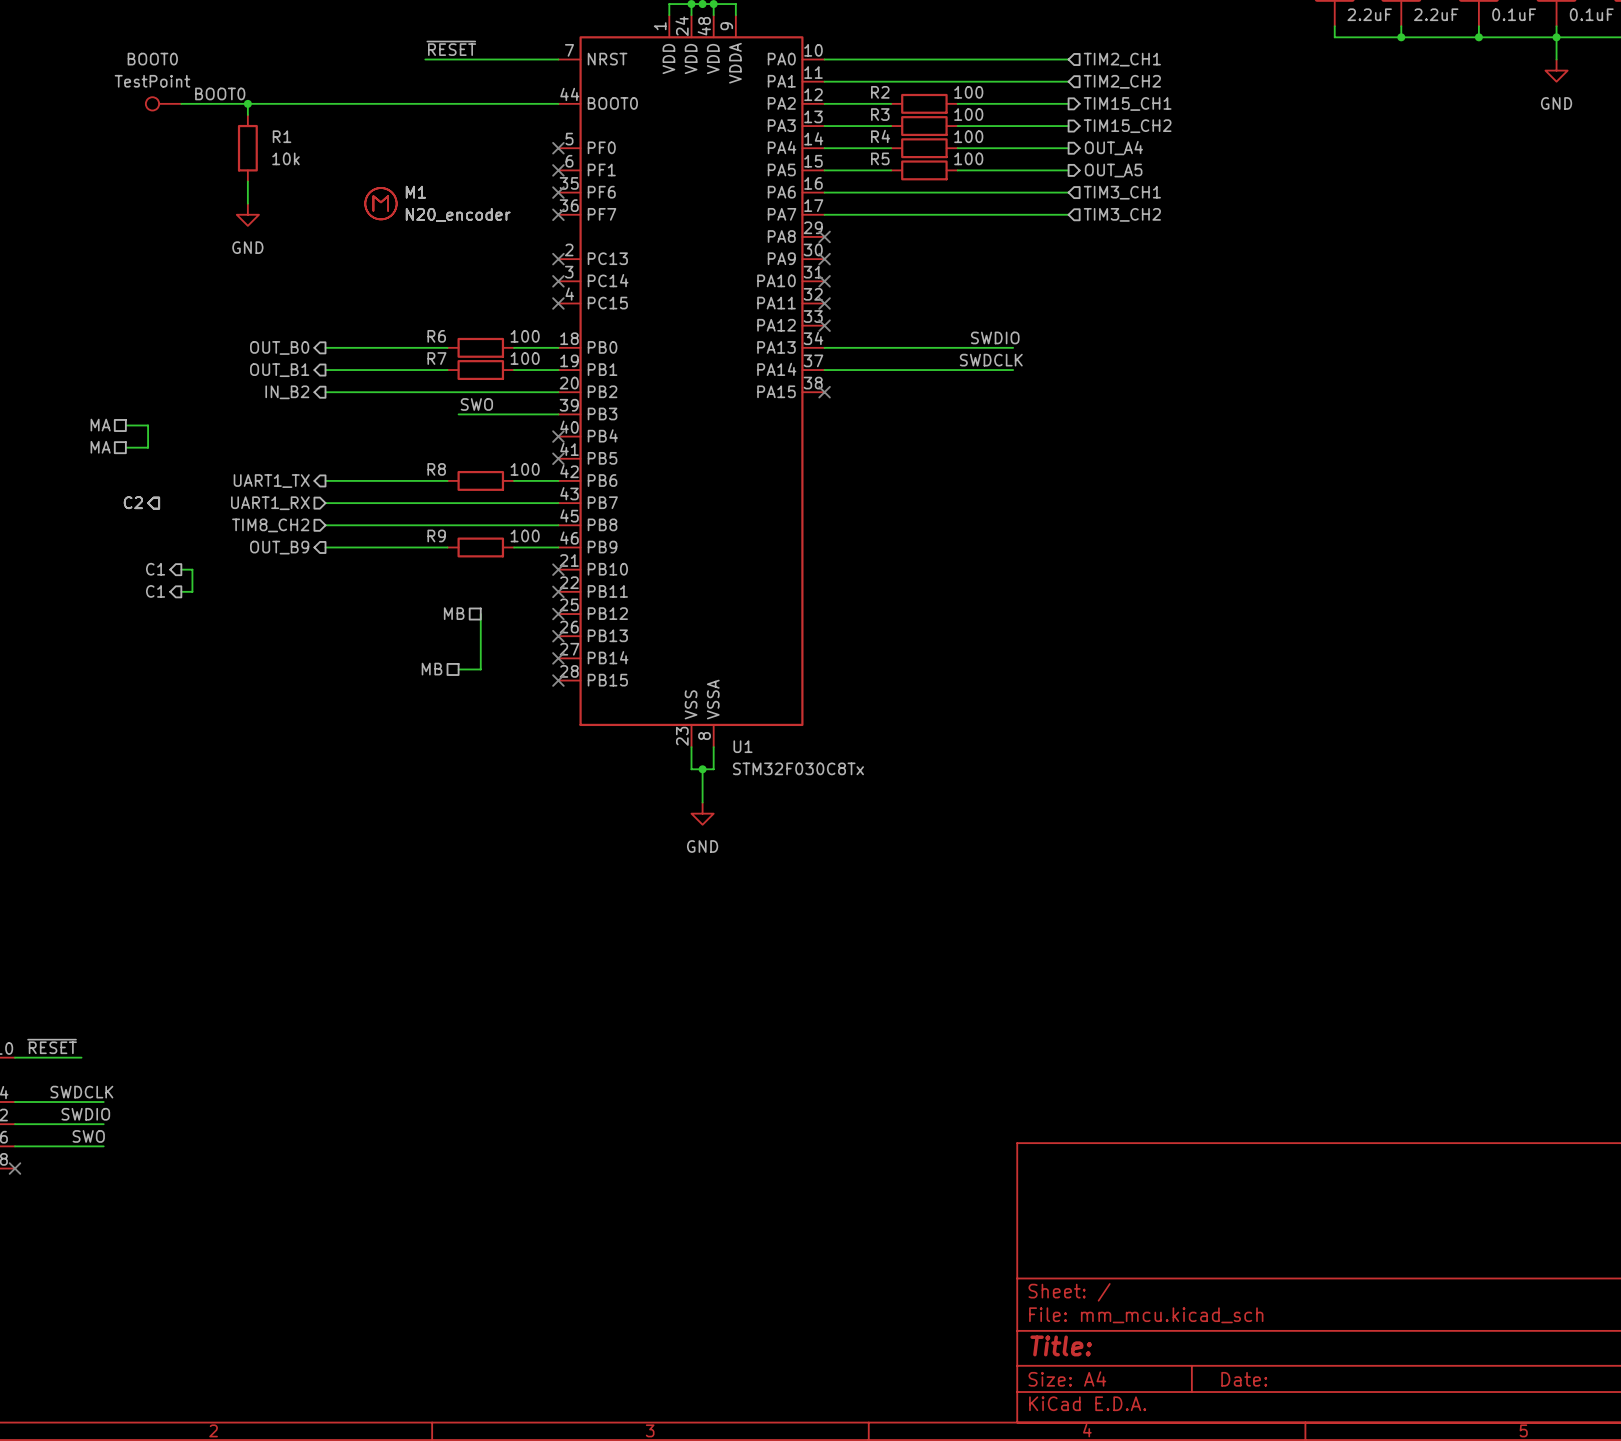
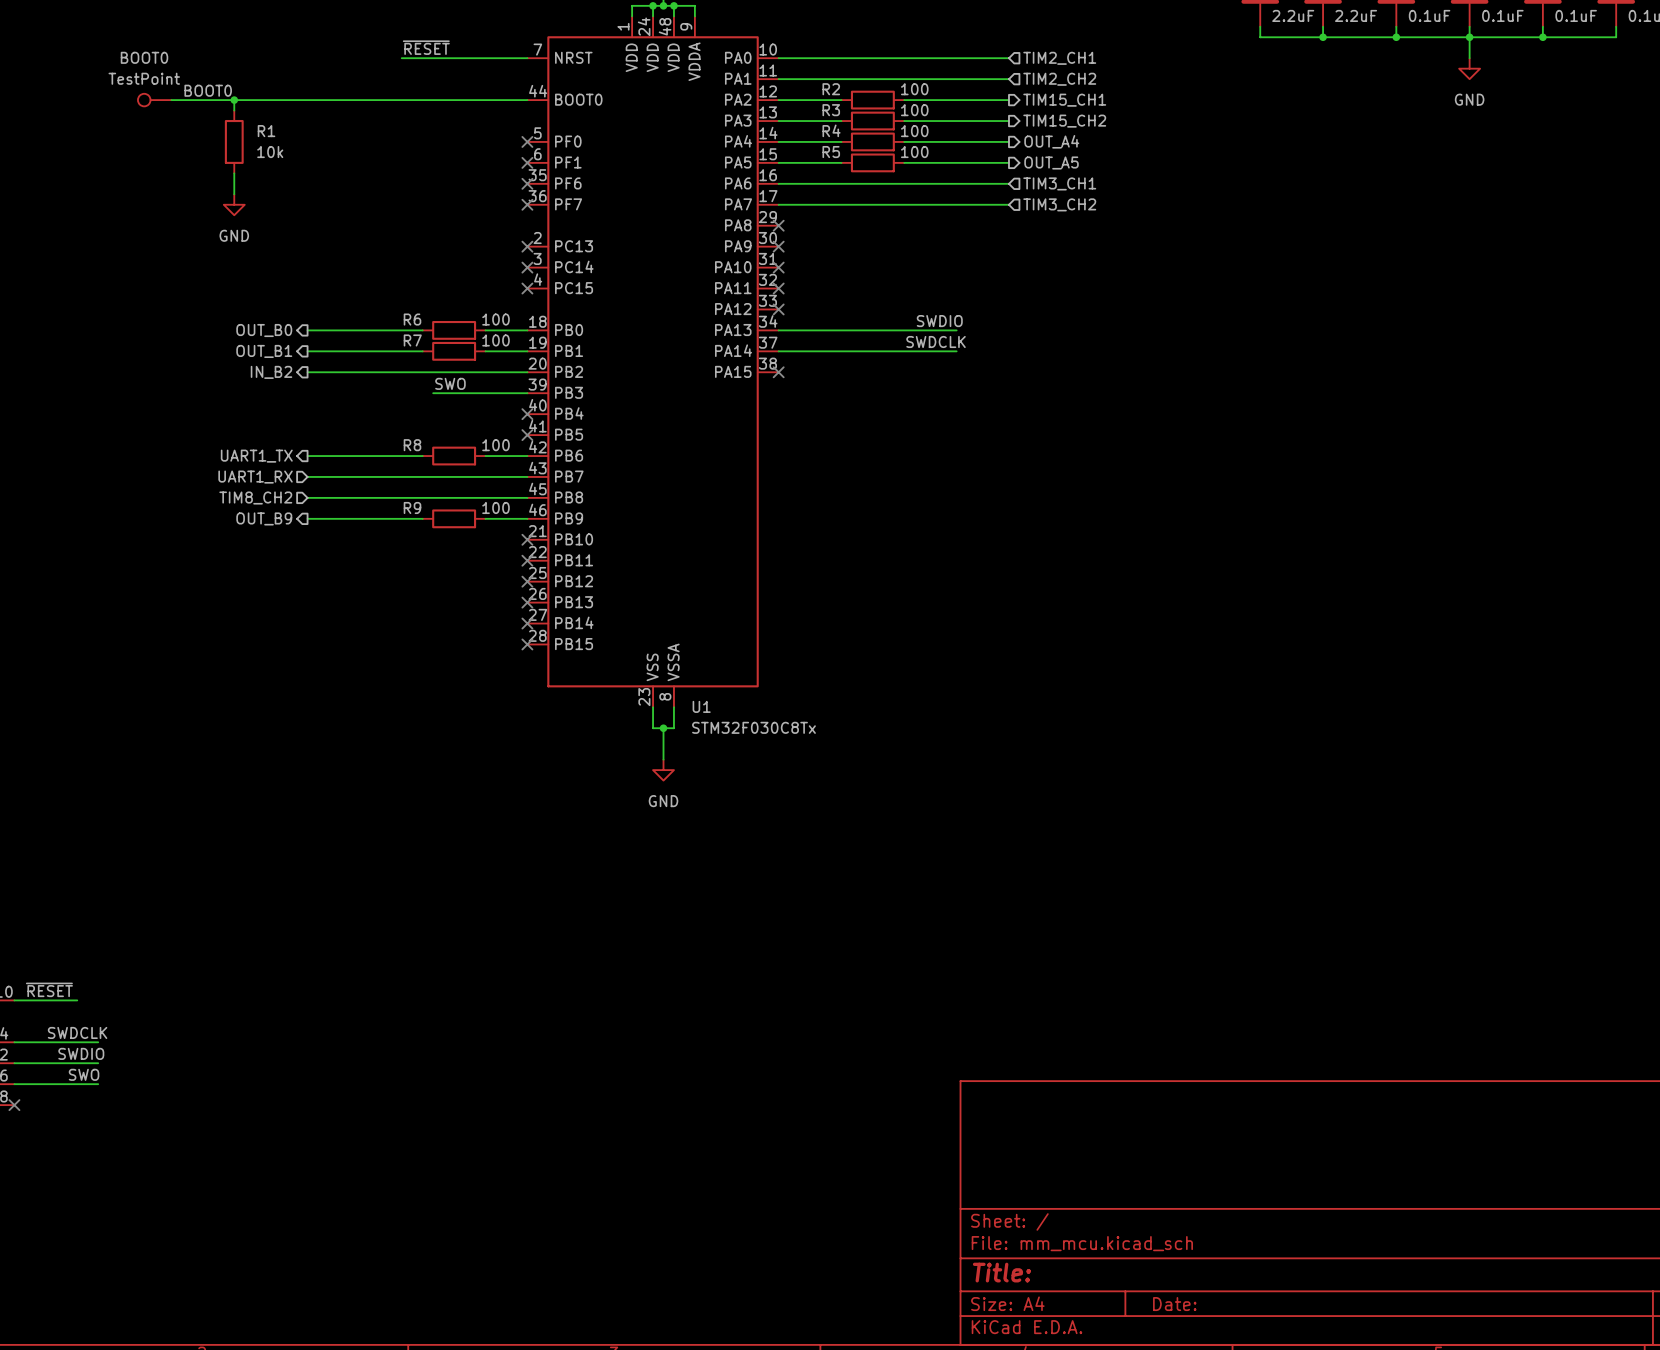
M1: N20_encoder (380, 203) -> none
hierarchical label: MA (100, 425) -> none
wire: (125, 425) (148, 425) (148, 447) (125, 447) -> none
hierarchical label: MA (100, 447) -> none
hierarchical label: C2 (133, 502) -> none
hierarchical label: C1 (155, 569) -> none
wire: (181, 569) (192, 569) (192, 591) (181, 591) -> none
hierarchical label: C1 (155, 591) -> none
hierarchical label: MB (454, 613) -> none
wire: (480, 614) (480, 669) (458, 669) -> none
hierarchical label: MB (432, 669) -> none

